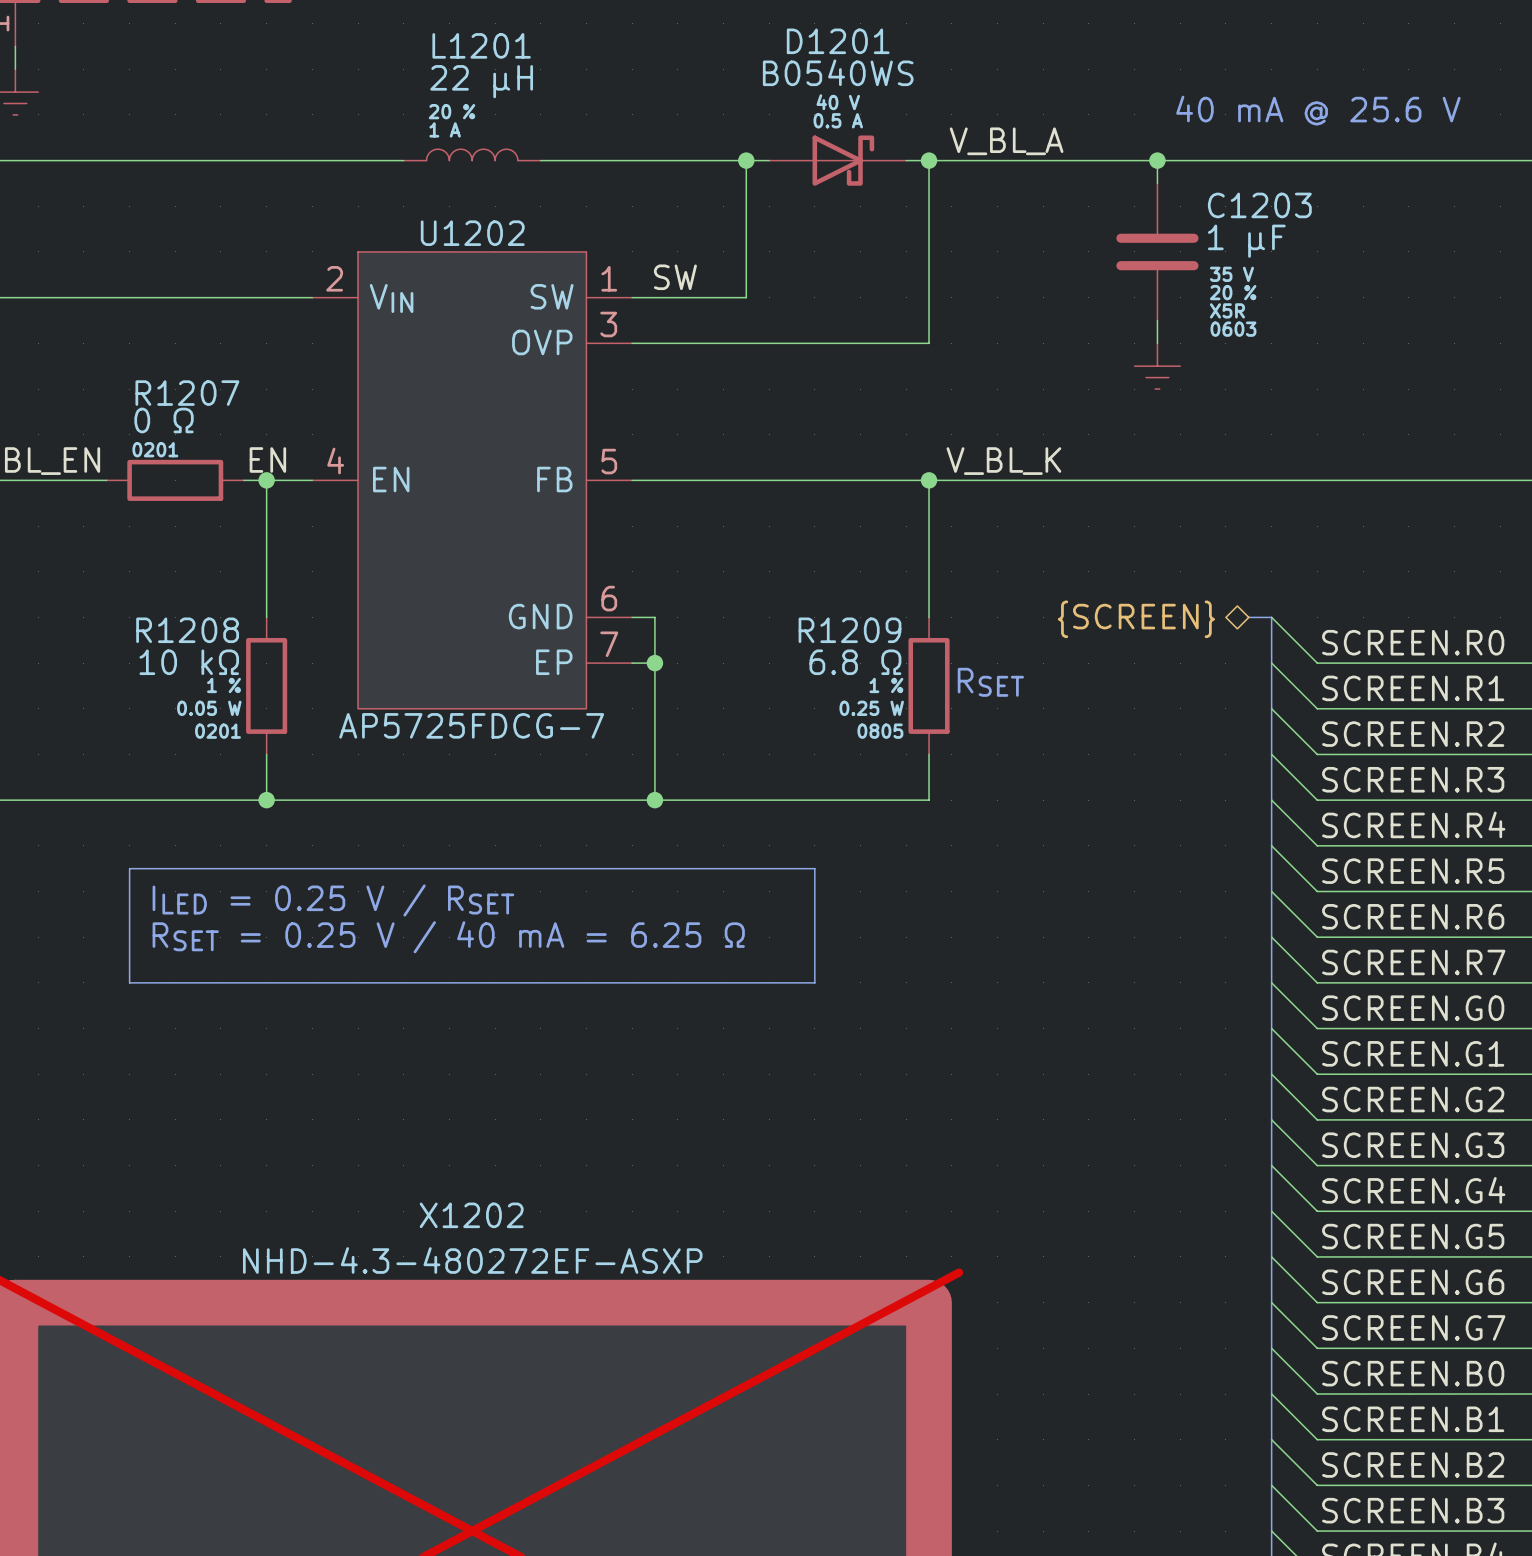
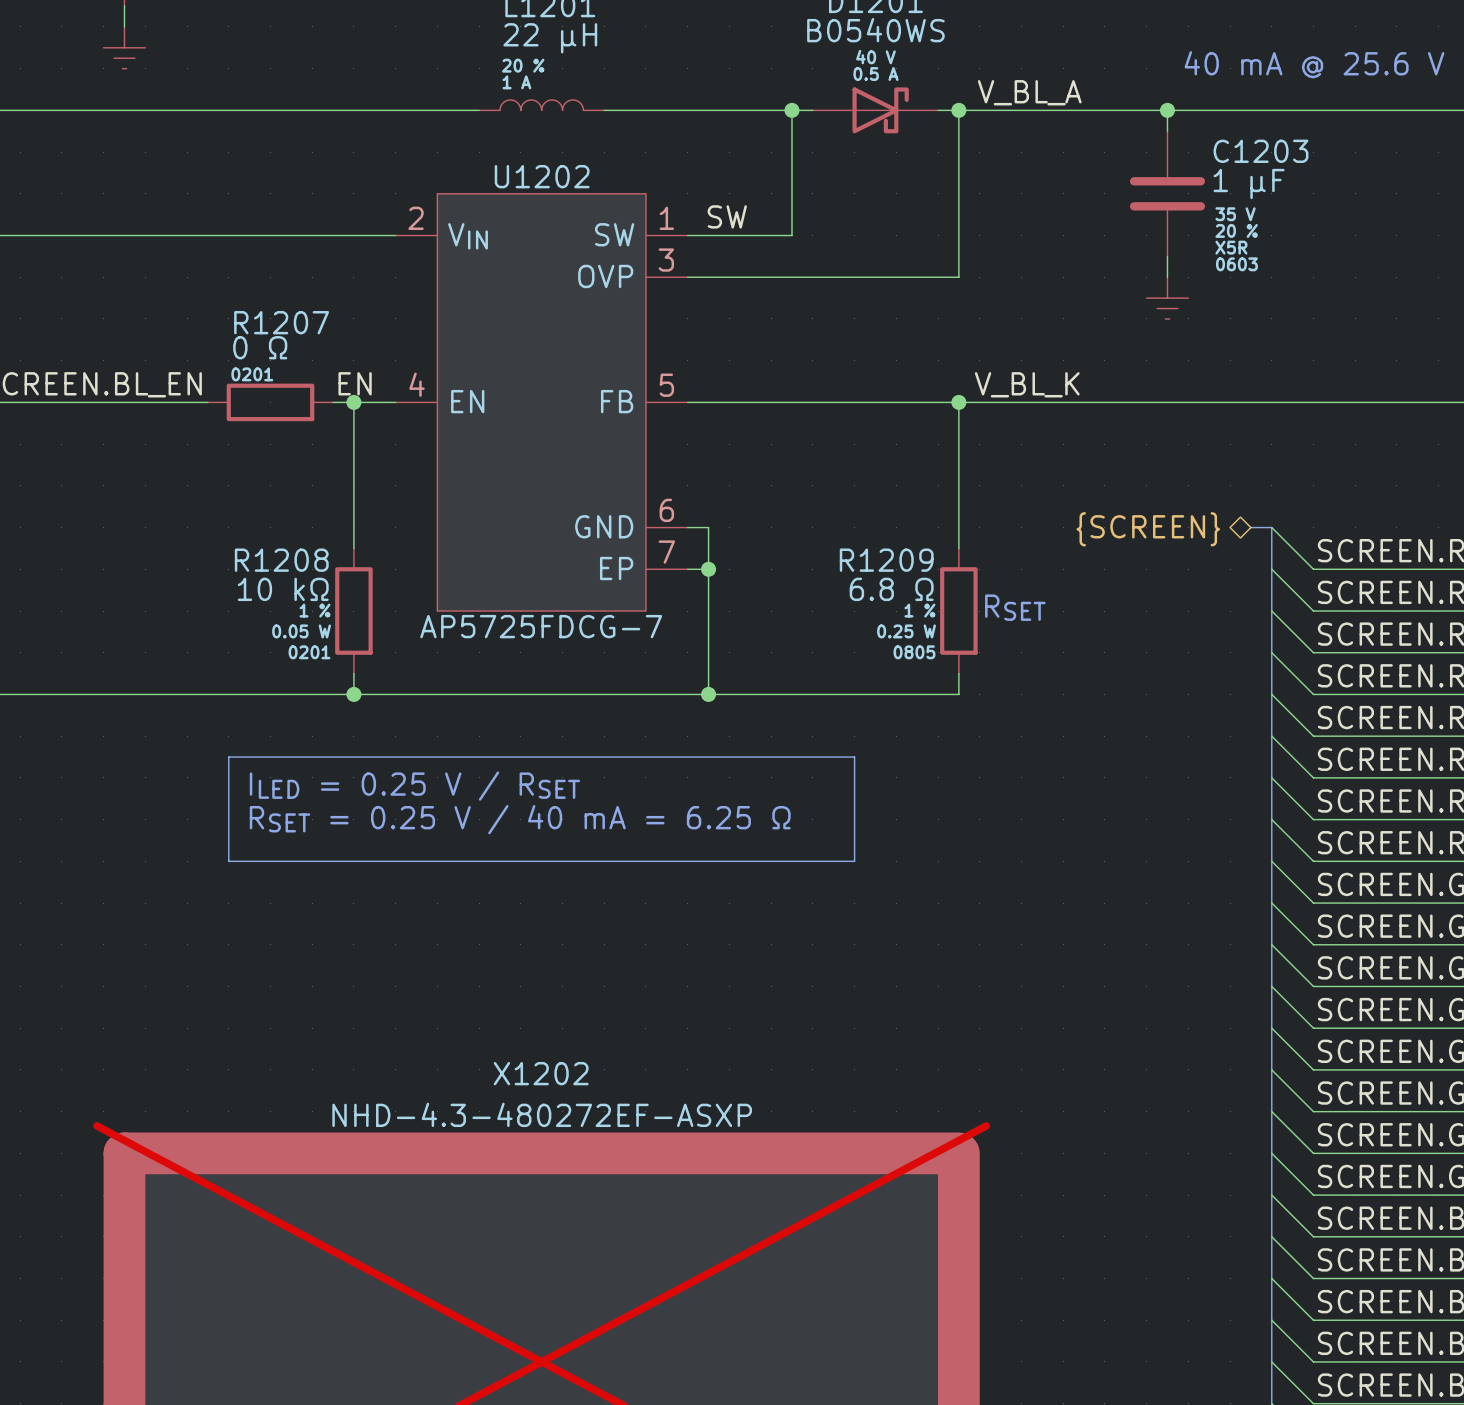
text position: RSET (990, 682) -> RSET (1015, 607)
R1208 position: (266, 685) -> (353, 611)
R1209 position: (929, 685) -> (958, 611)

